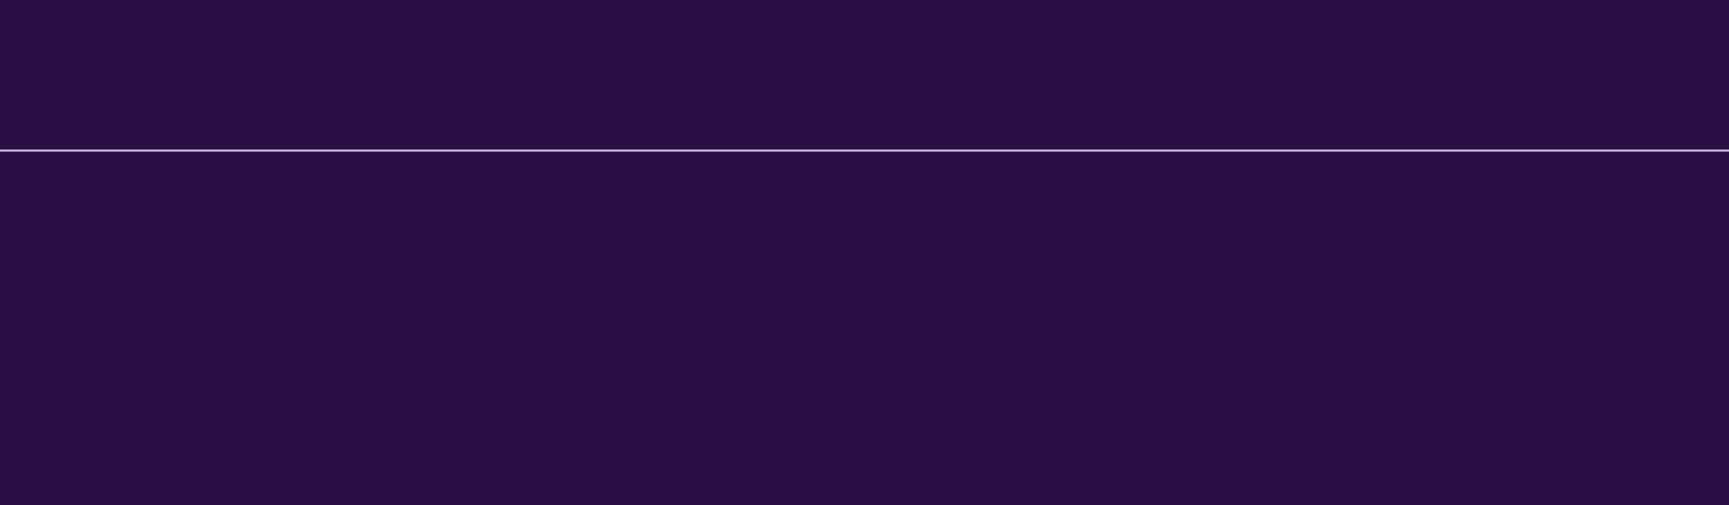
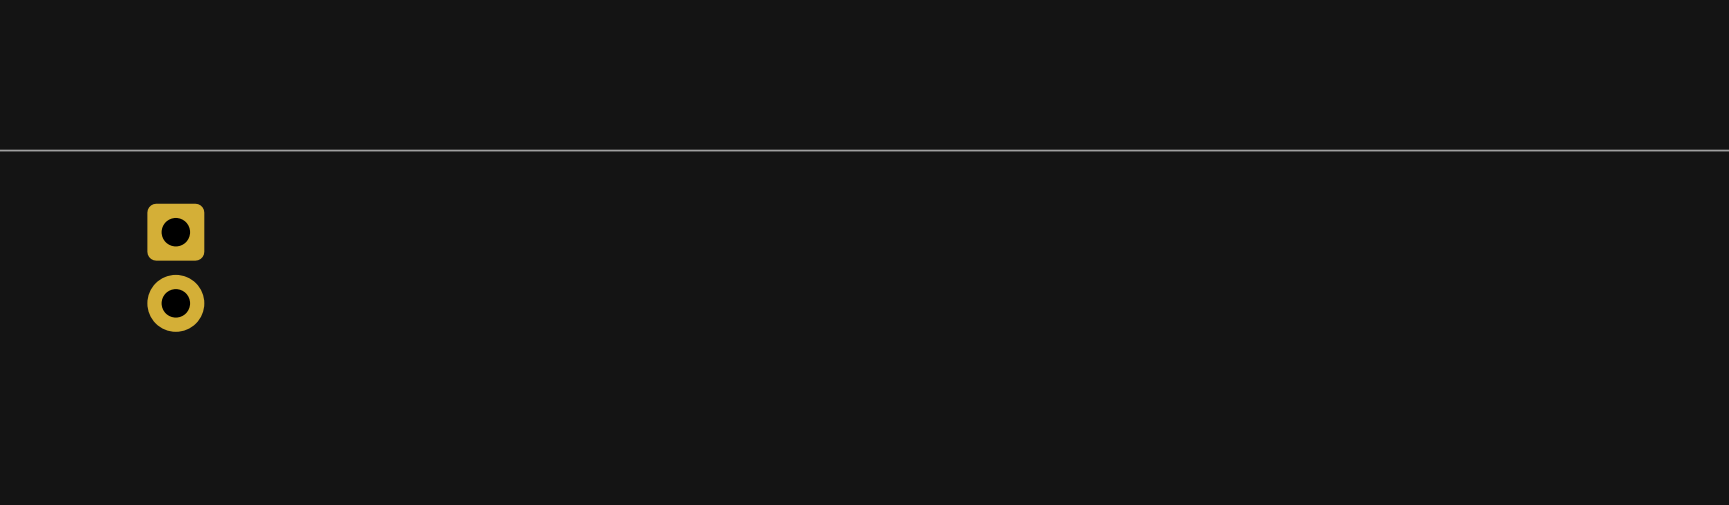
part: none -> (175, 267)

